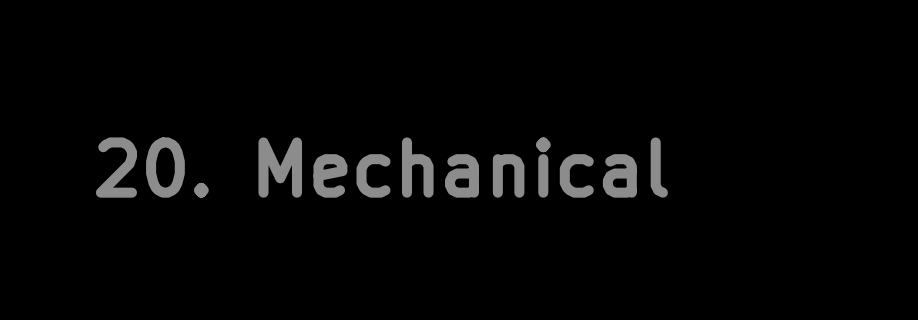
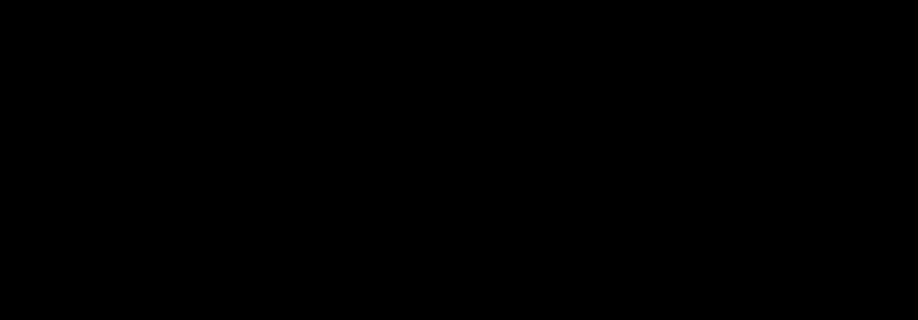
text: 20. Mechanical (381, 167) -> none

